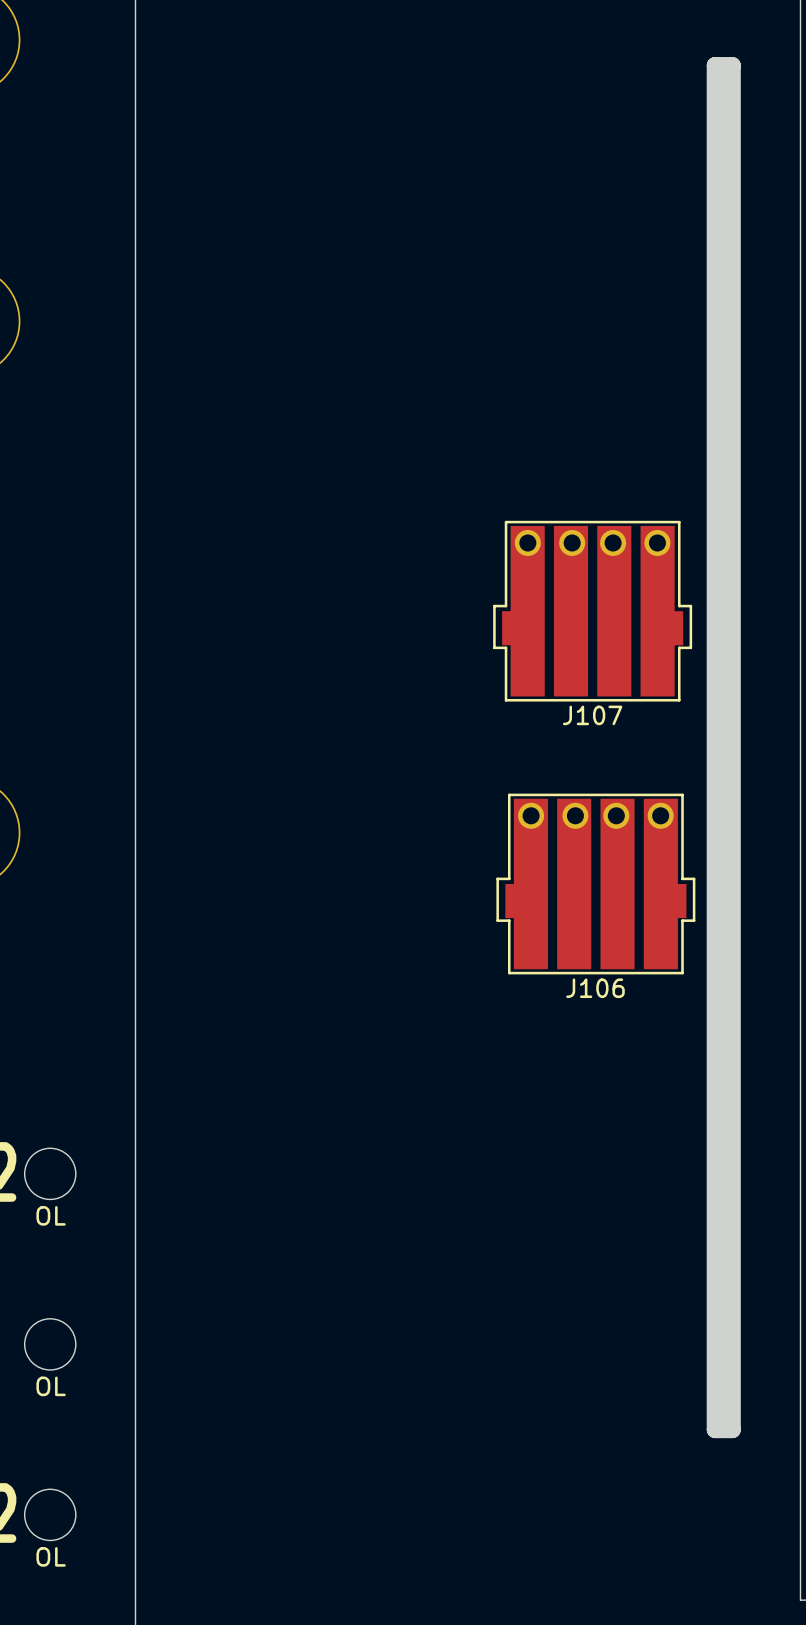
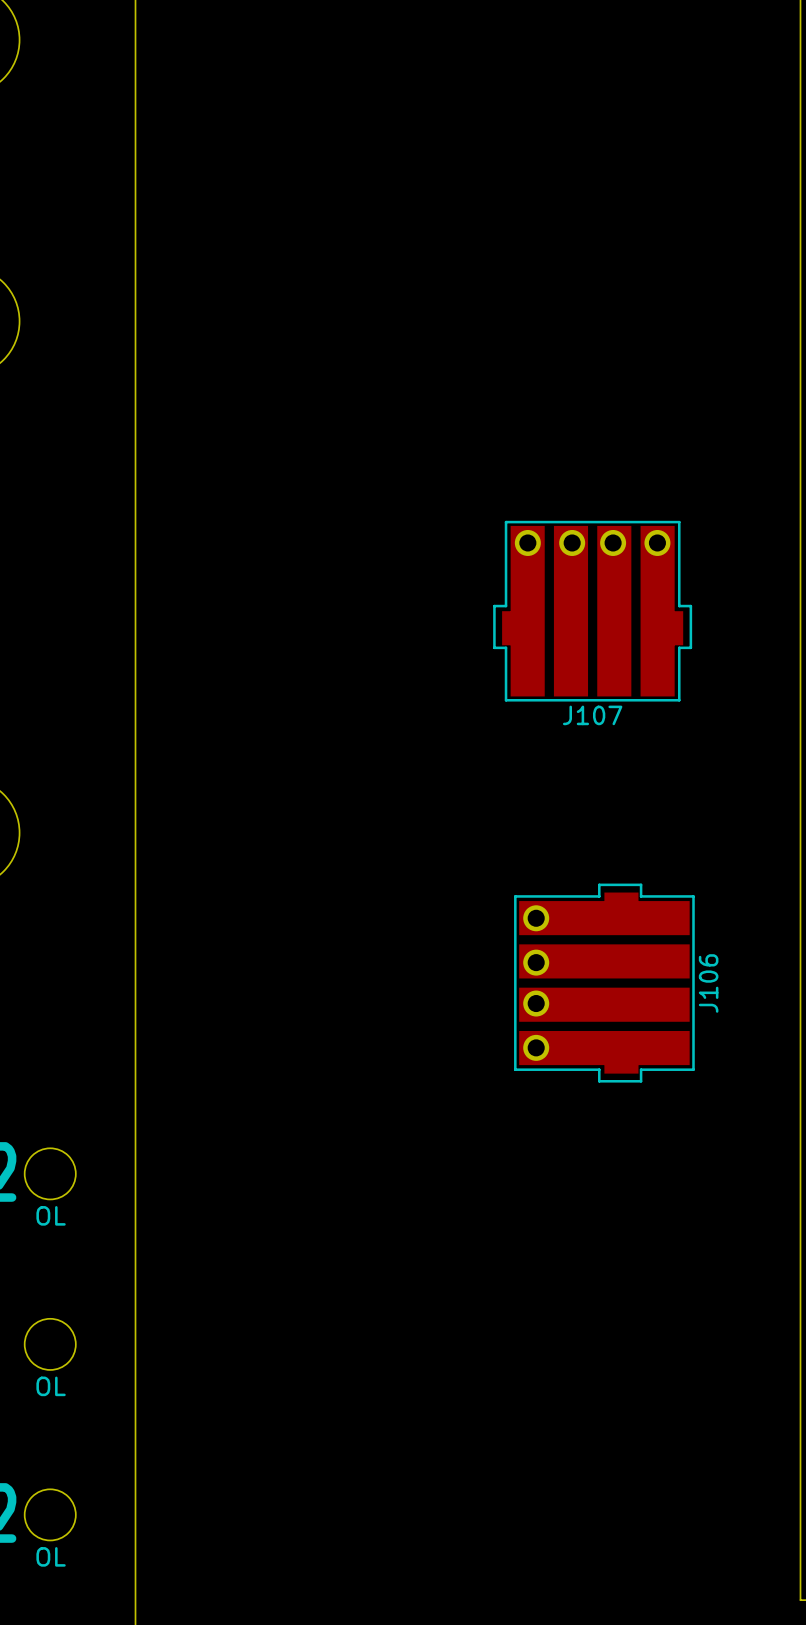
board edge: (715, 65) (715, 1429) (732, 1429) (732, 65) (715, 65) -> none
J106 rotation: 0° (595, 884) -> 90° counterclockwise (604, 983)

